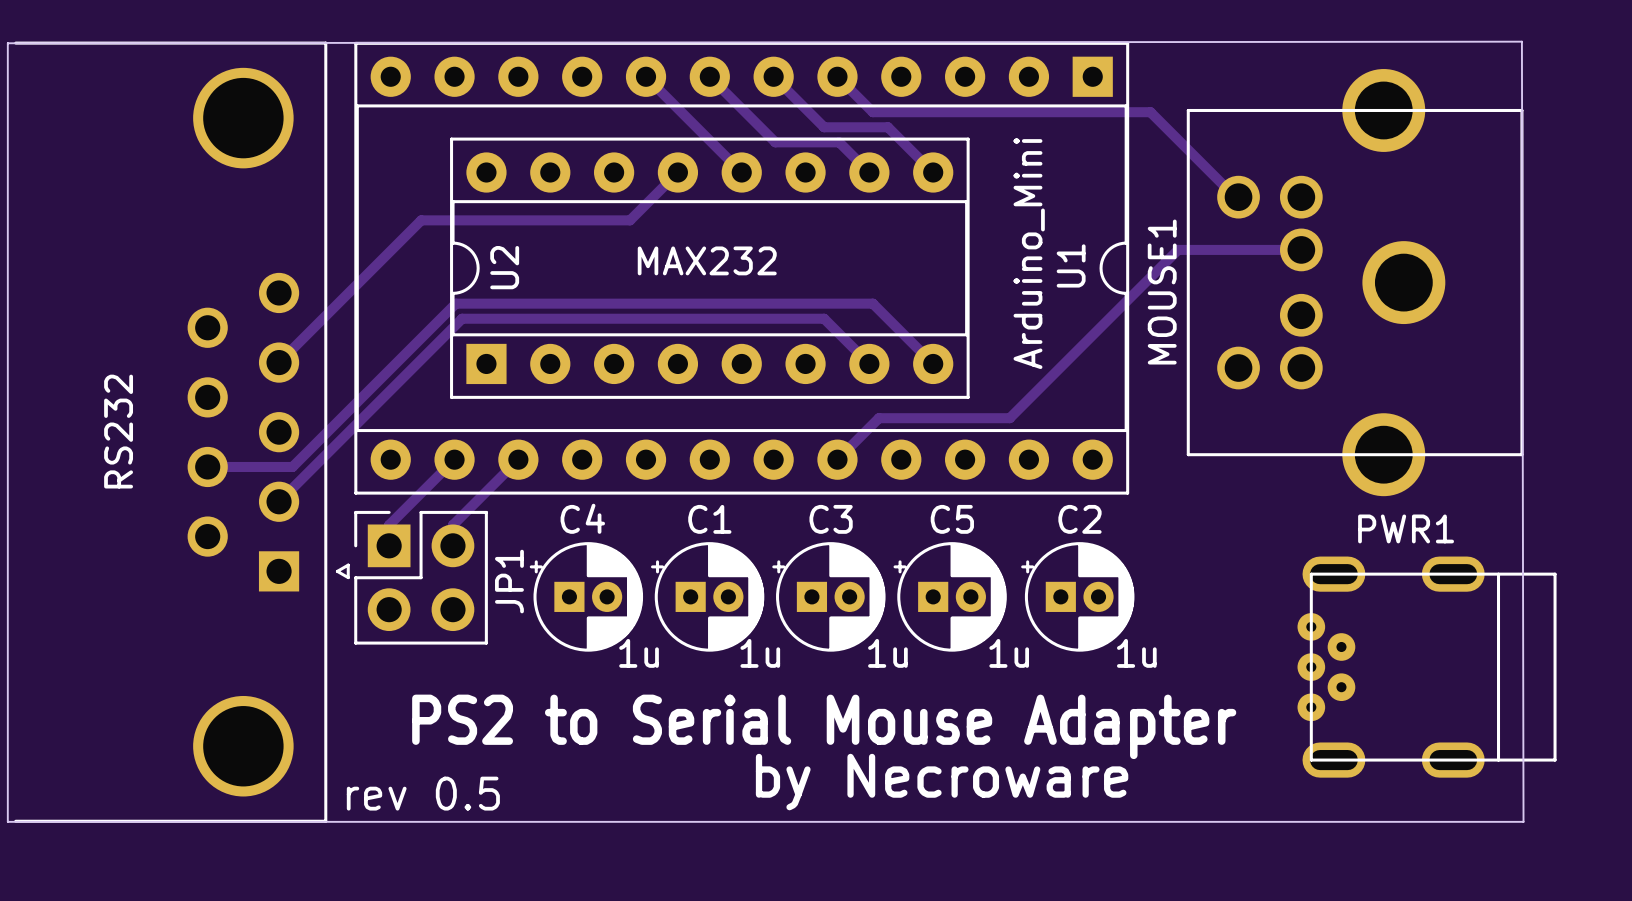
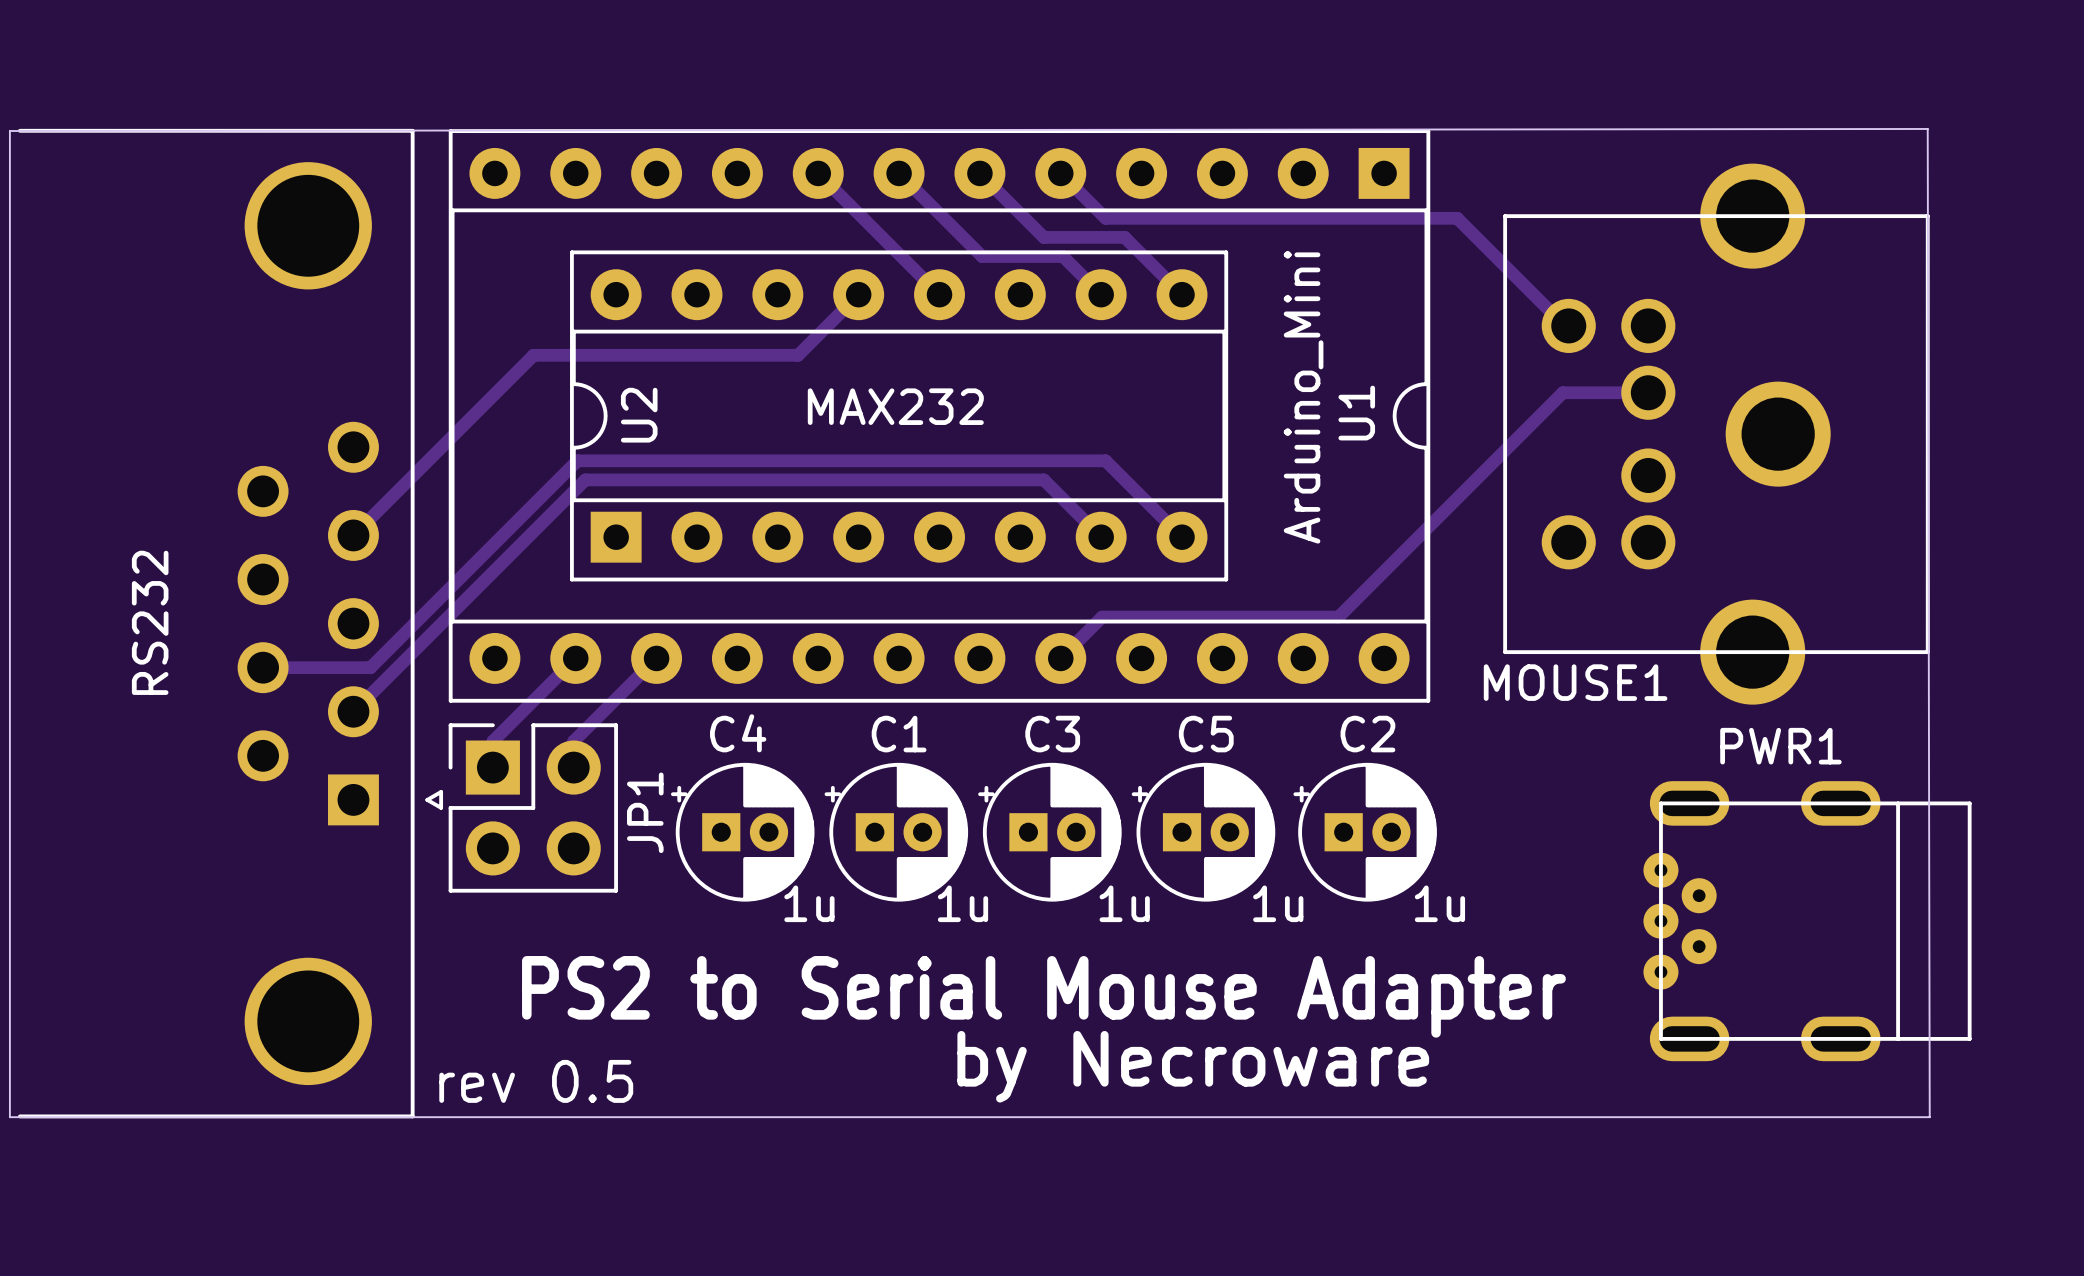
track: (1233, 249) (1178, 249) (1009, 418) (878, 418) (870, 427) -> (1562, 392) (1338, 617) (1102, 617)
MOUSE1 name rotation: 0° (1162, 292) -> 90° clockwise (1575, 682)
MOUSE1 name position: MOUSE1 (1162, 292) -> MOUSE1 (1575, 682)

